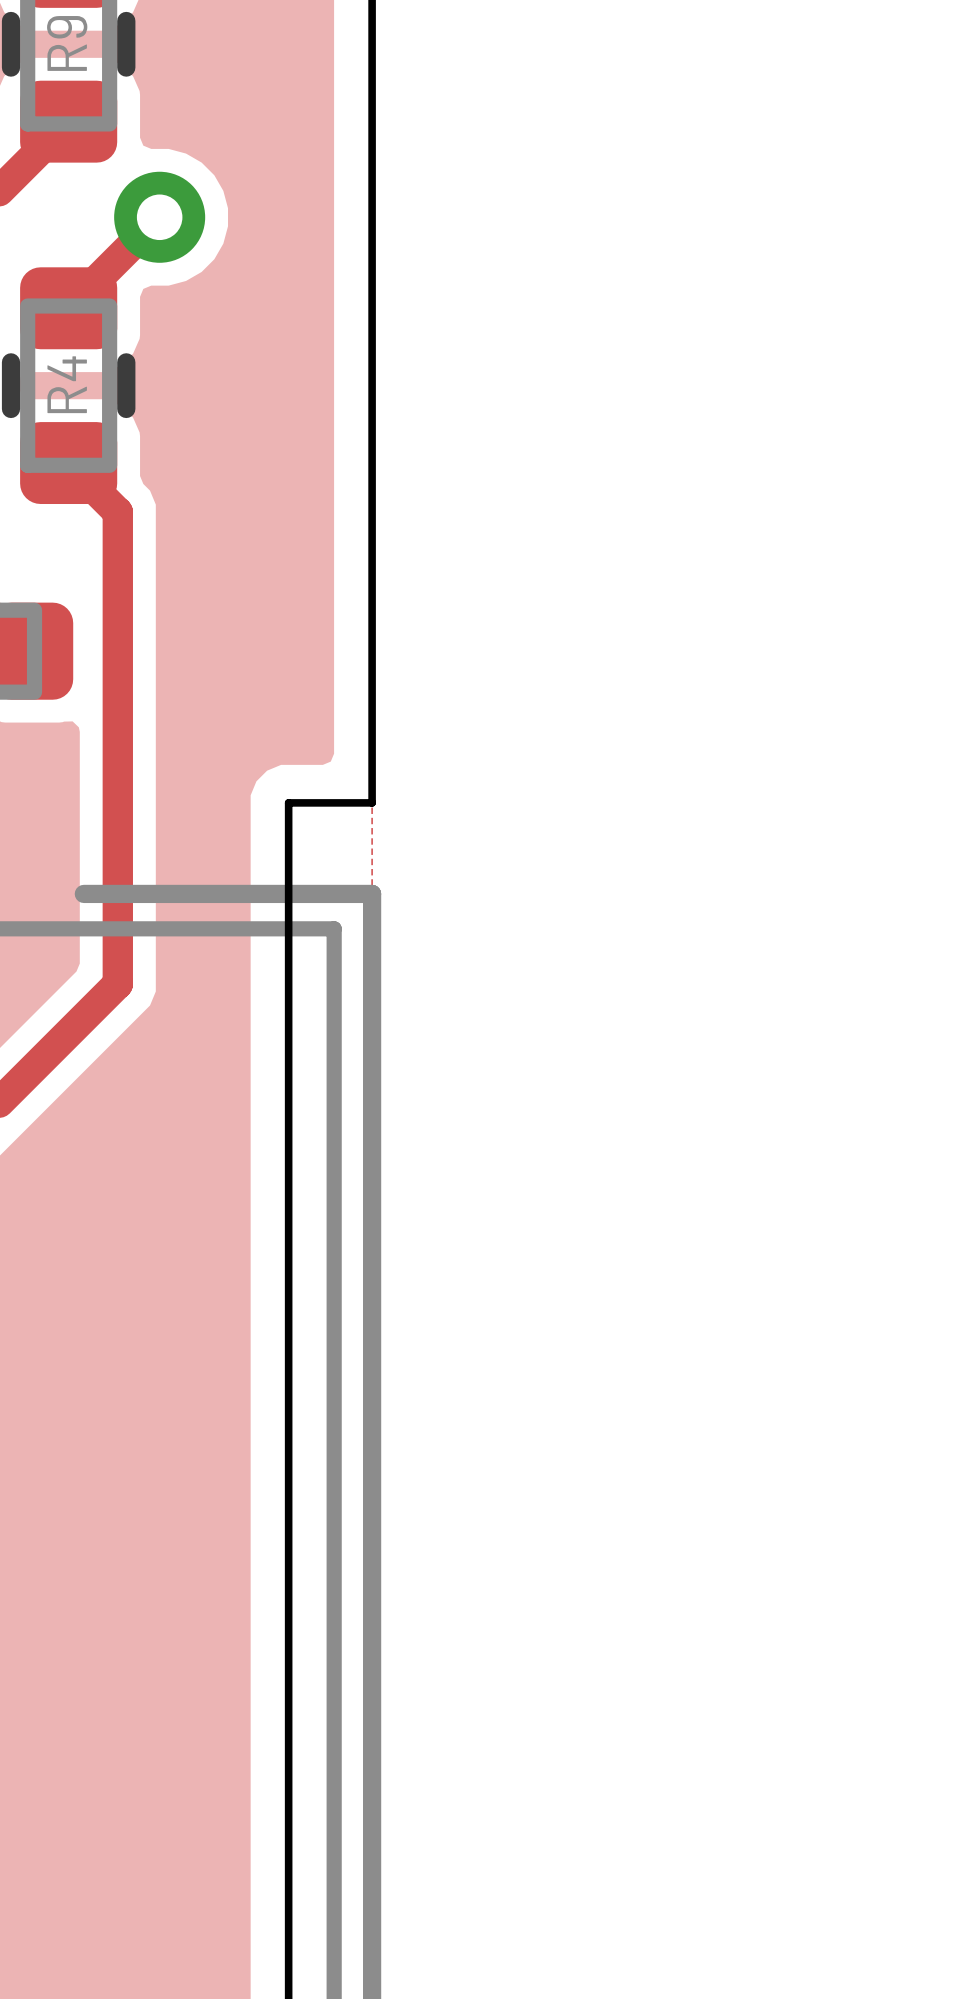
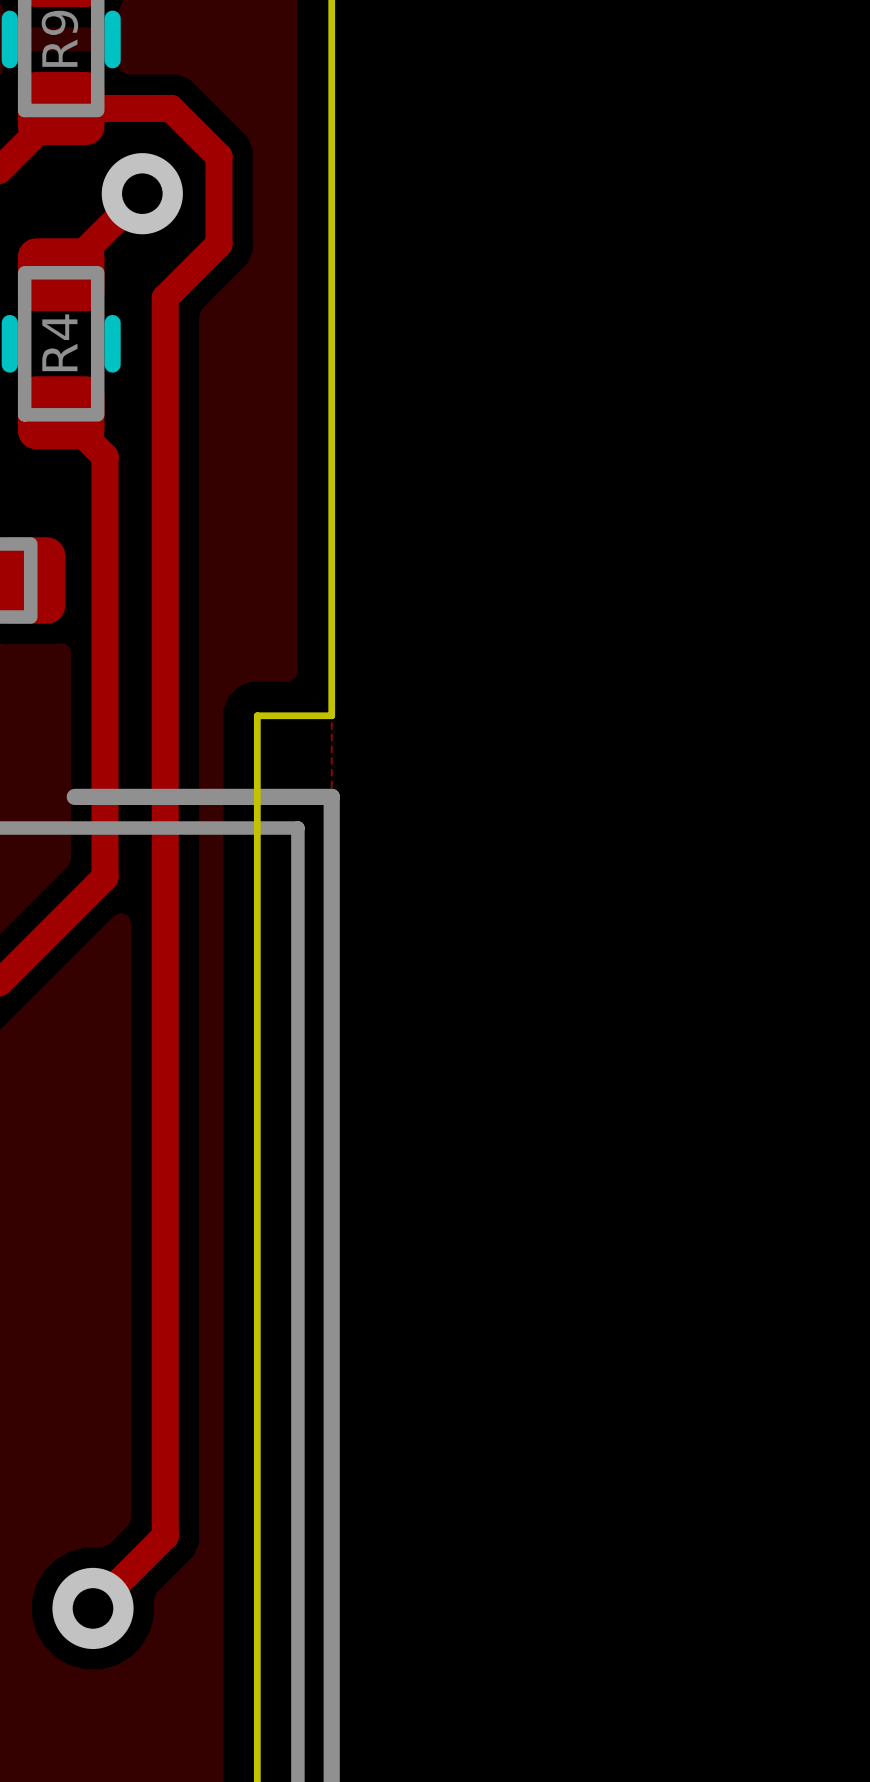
track: none -> (61, 108) (171, 108) (218, 156) (218, 244) (165, 297) (165, 1536) (93, 1608)
via: none -> (93, 1608)

